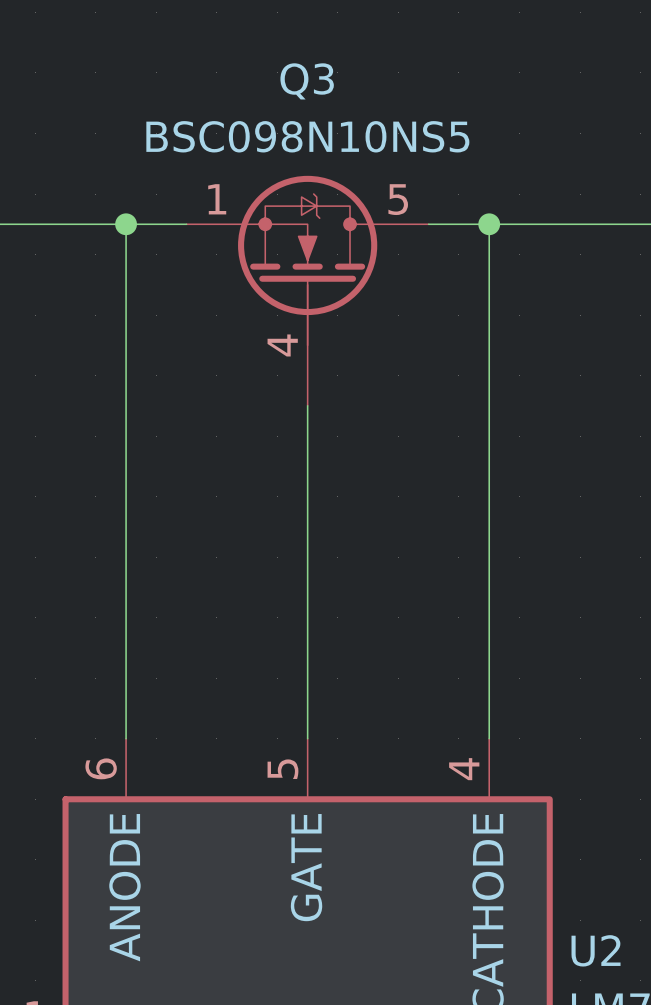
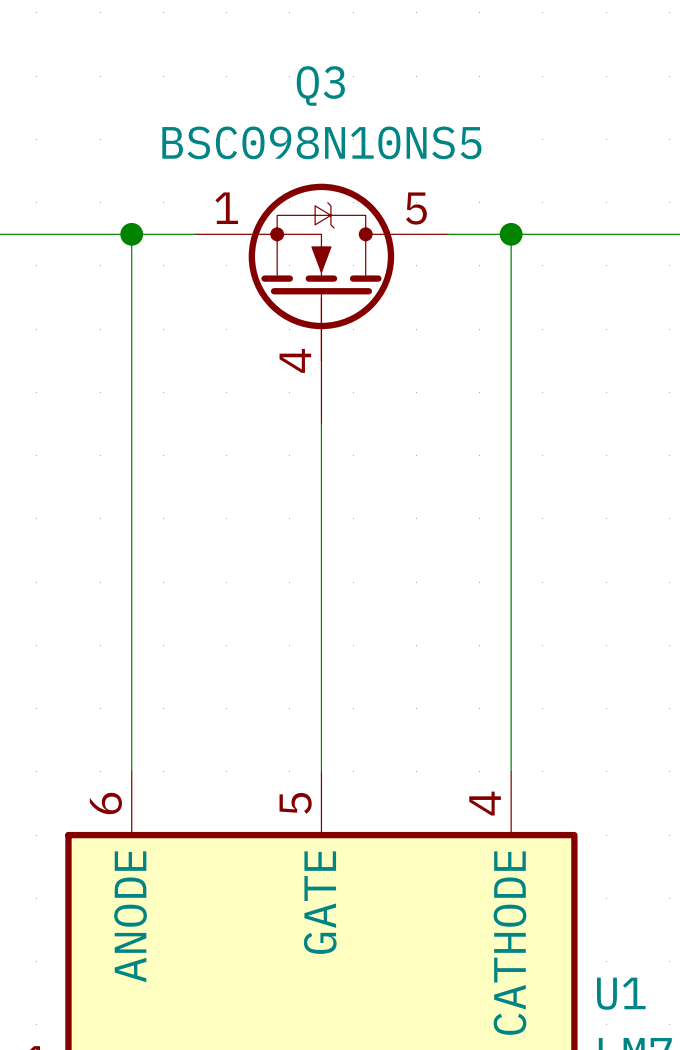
U2 name: U2 (596, 950) -> U1 (621, 993)

